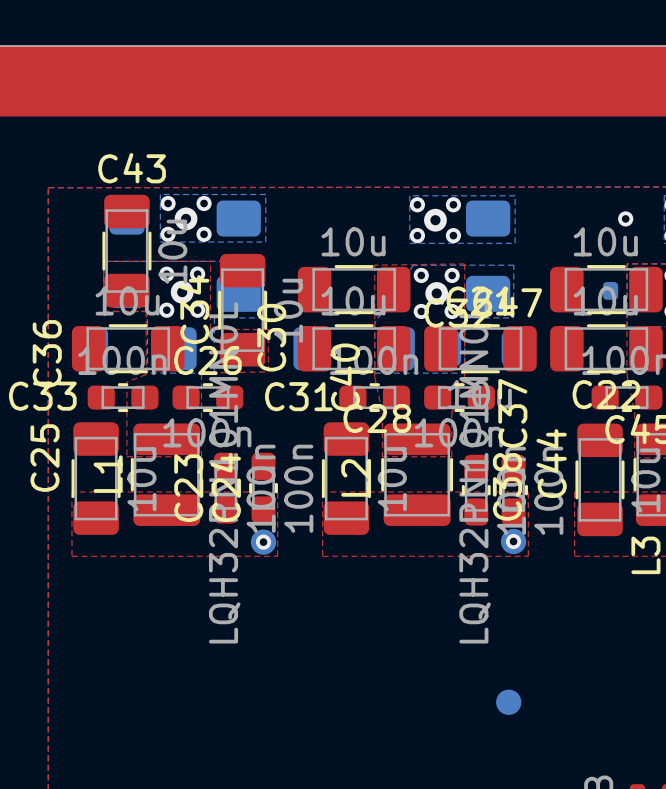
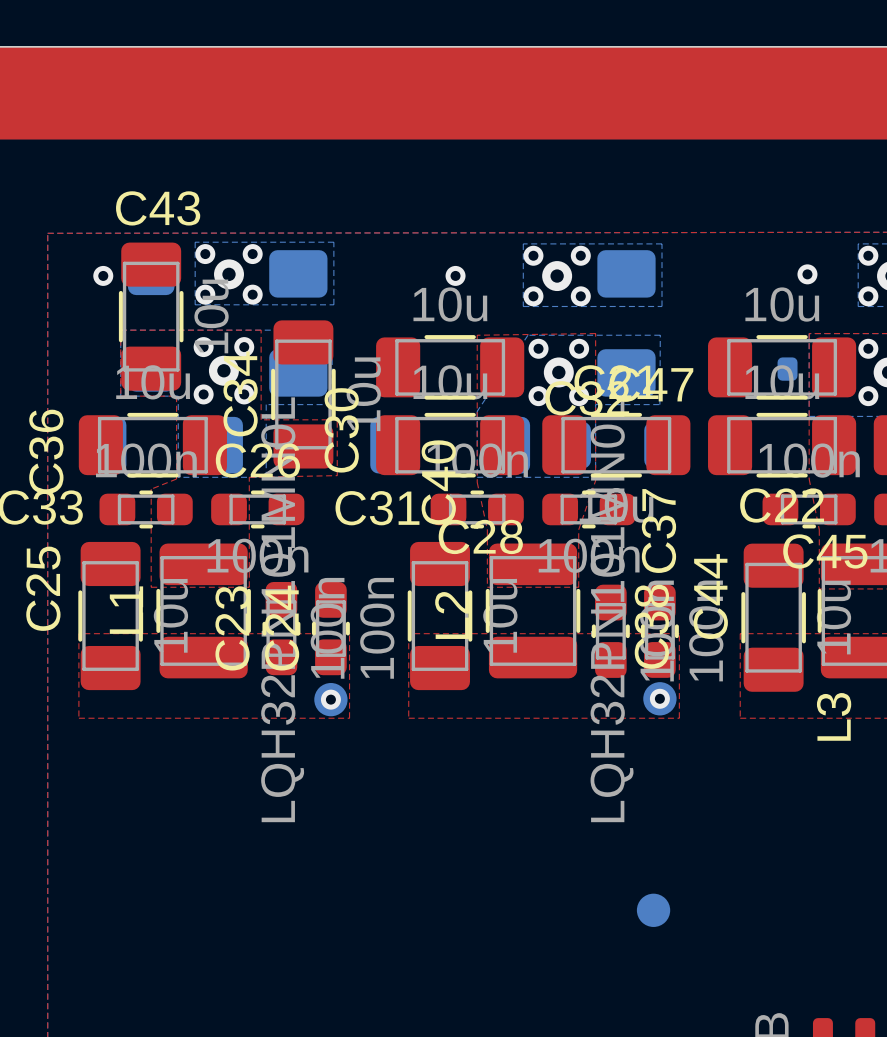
via: none -> (103, 275)
via: none -> (455, 275)

